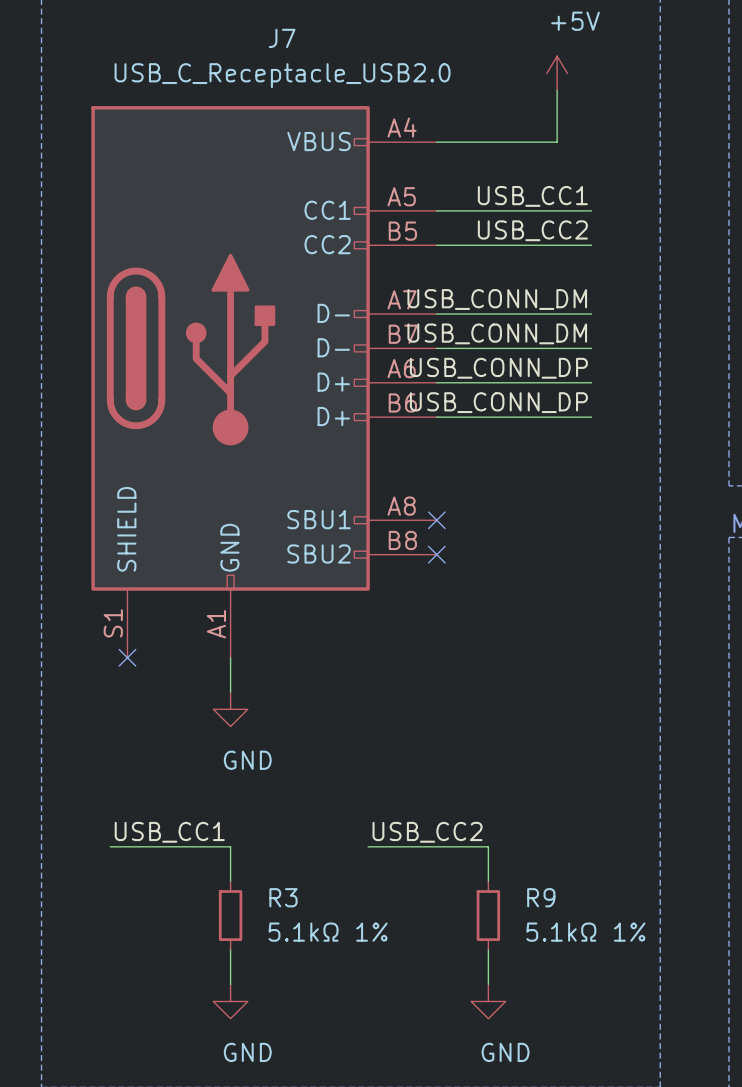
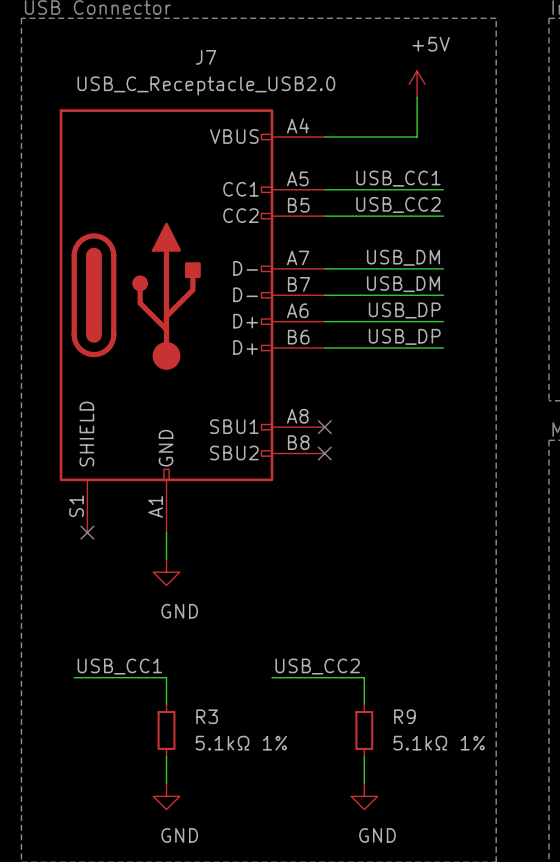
label: USB_CONN_DM (497, 299) -> USB_DM (403, 257)
label: USB_CONN_DM (497, 333) -> USB_DM (403, 284)
label: USB_CONN_DP (498, 368) -> USB_DP (404, 310)
label: USB_CONN_DP (498, 402) -> USB_DP (404, 336)

